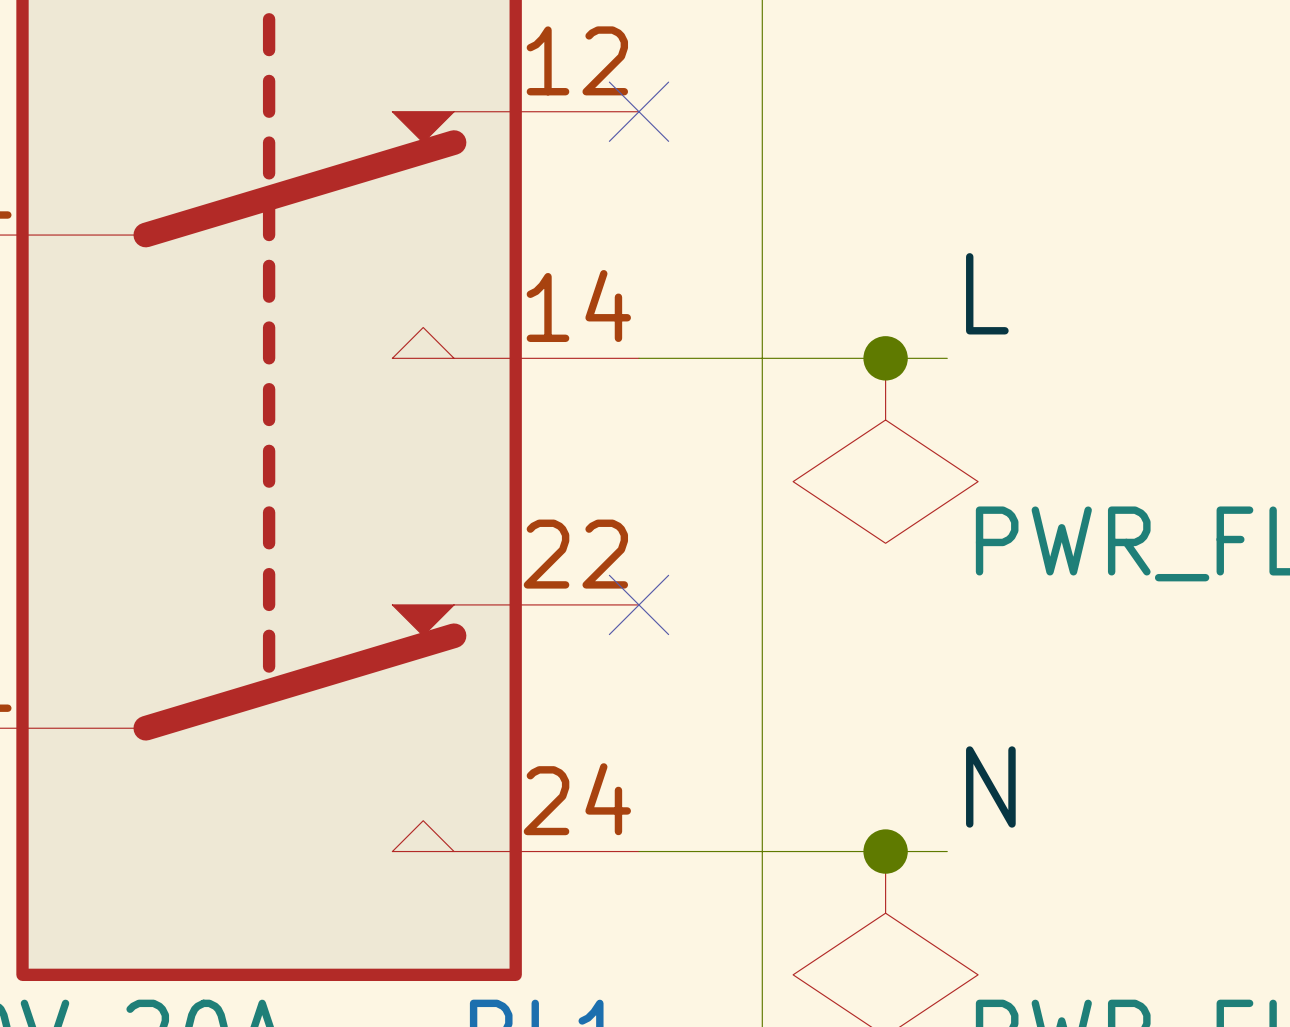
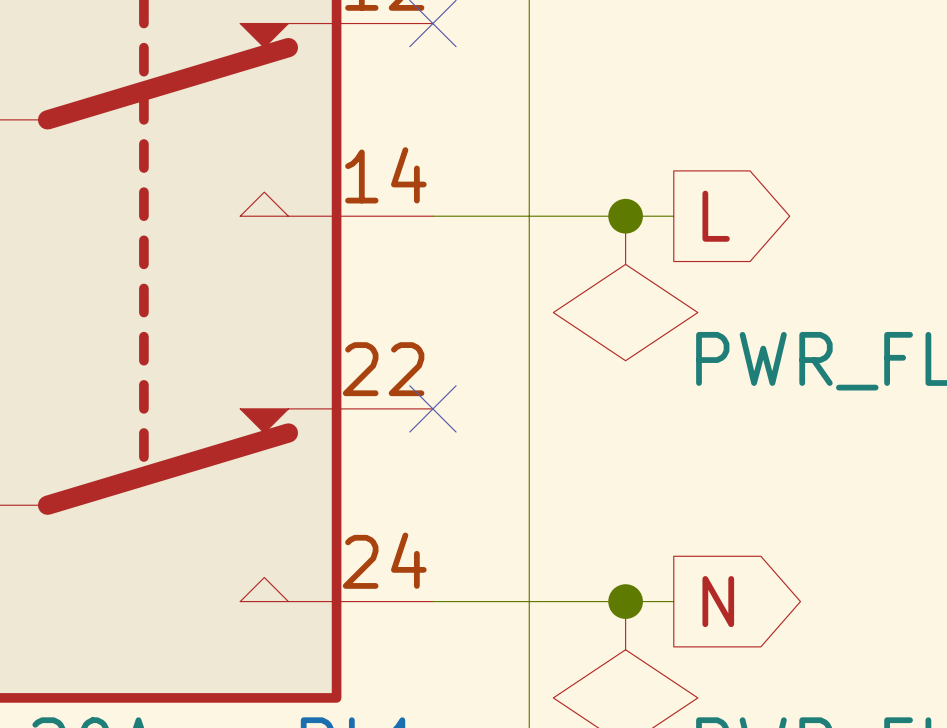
label: L (987, 293) -> none
global label: none -> L (716, 216)
label: N (990, 787) -> none
global label: none -> N (718, 601)

